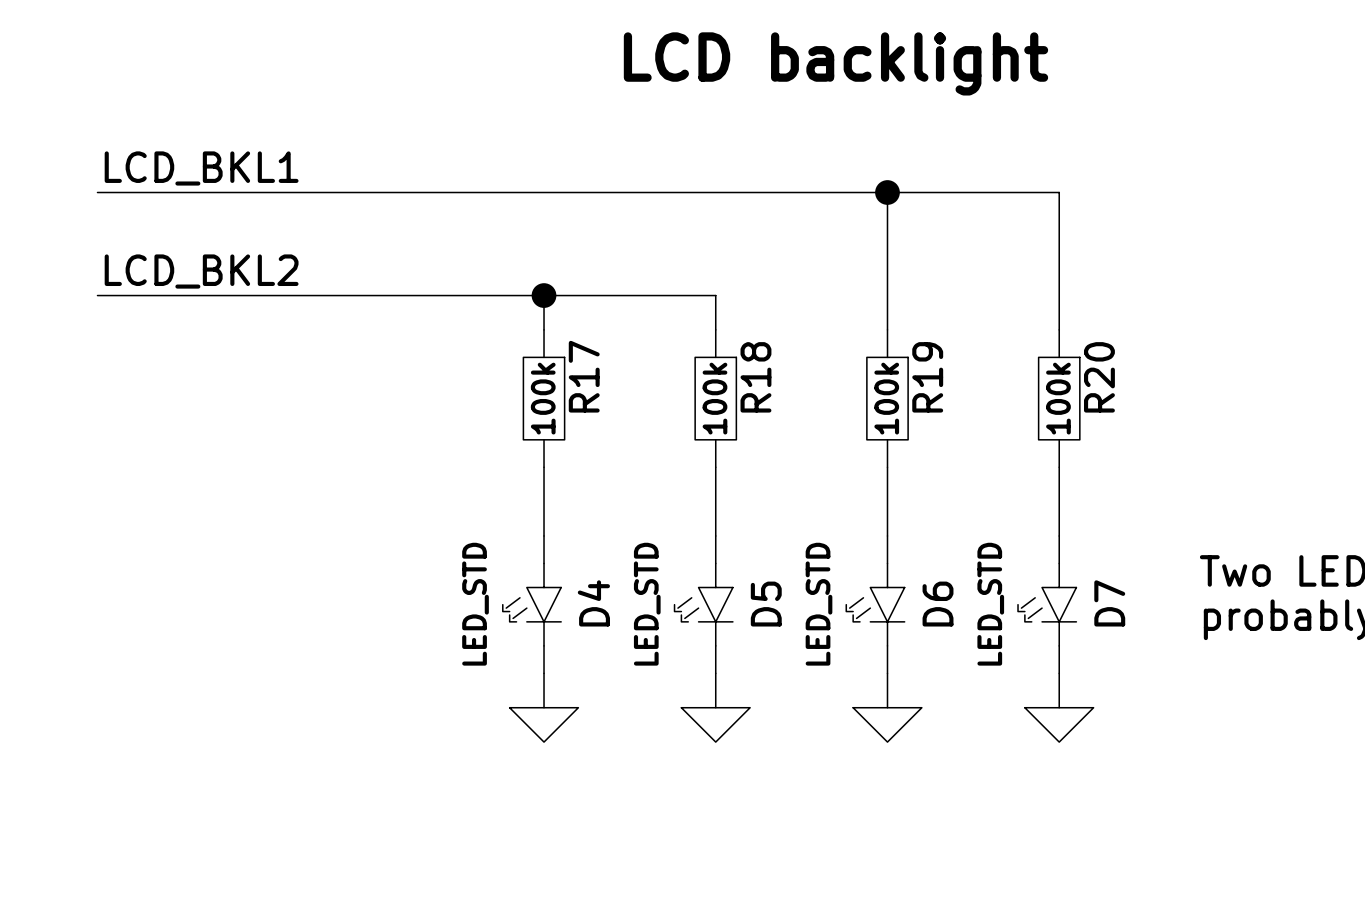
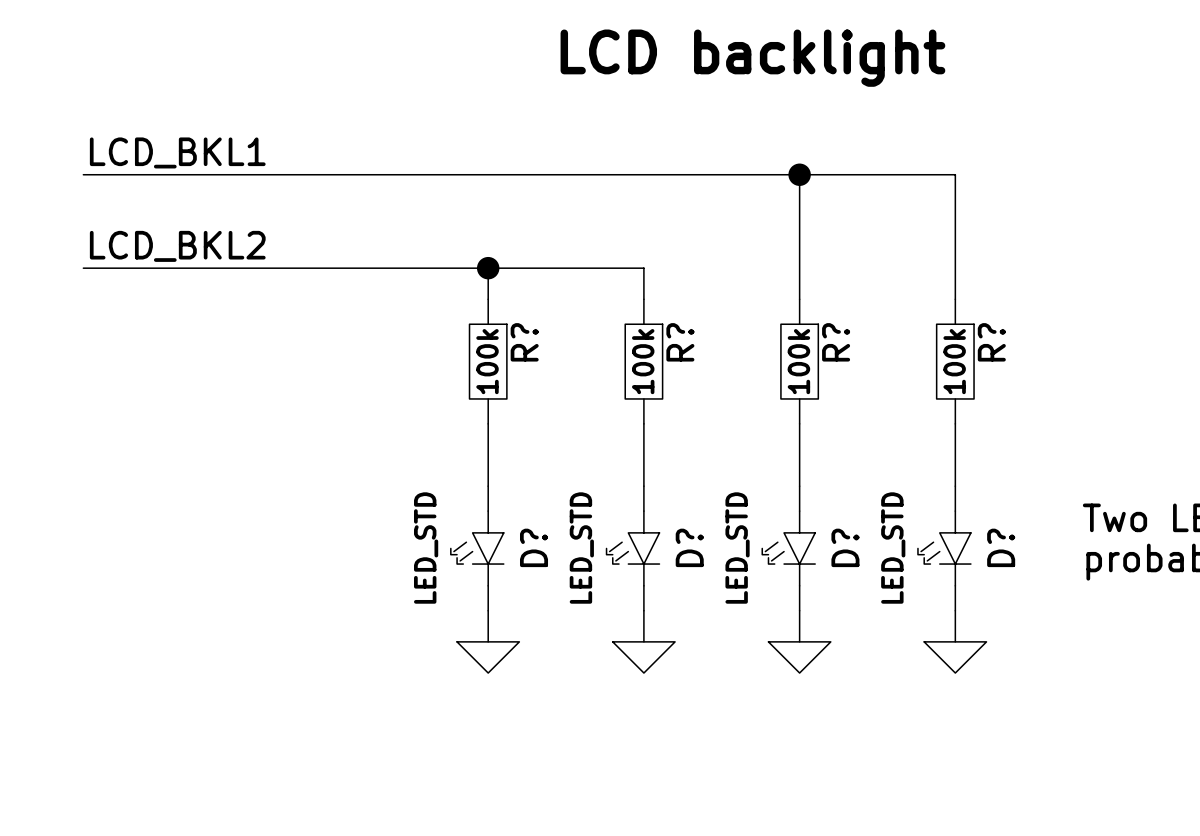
R17 name: R17 (584, 376) -> R? (524, 342)
R18 name: R18 (755, 377) -> R? (680, 342)
R19 name: R19 (927, 377) -> R? (836, 342)
R20 name: R20 (1099, 377) -> R? (991, 342)
D4 name: D4 (593, 603) -> D? (534, 547)
D7 name: D7 (1109, 603) -> D? (1001, 547)
D5 name: D5 (766, 604) -> D? (689, 547)
D6 name: D6 (938, 604) -> D? (845, 547)

